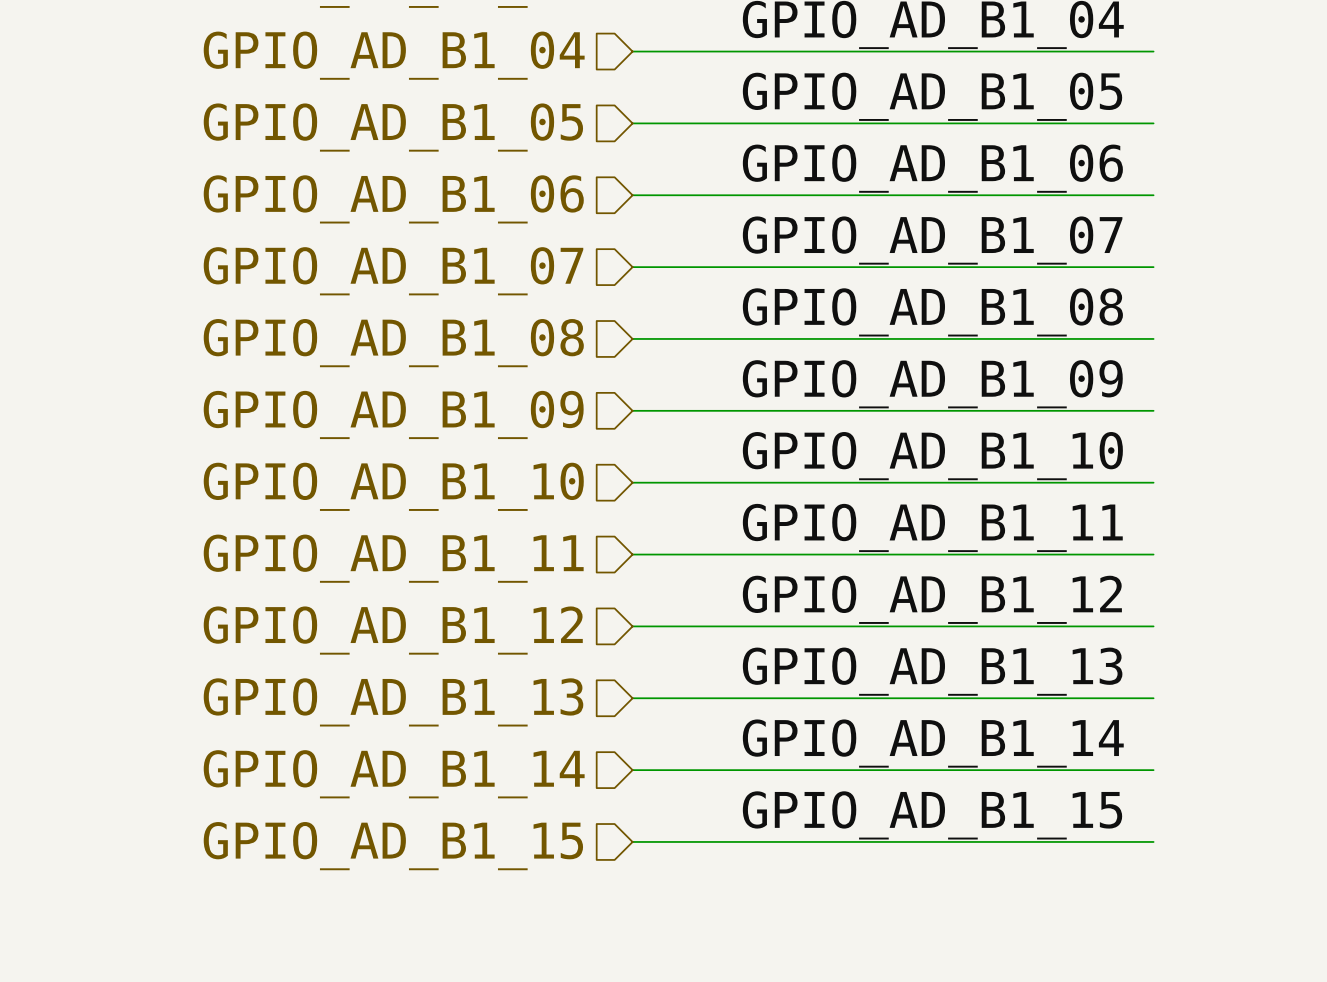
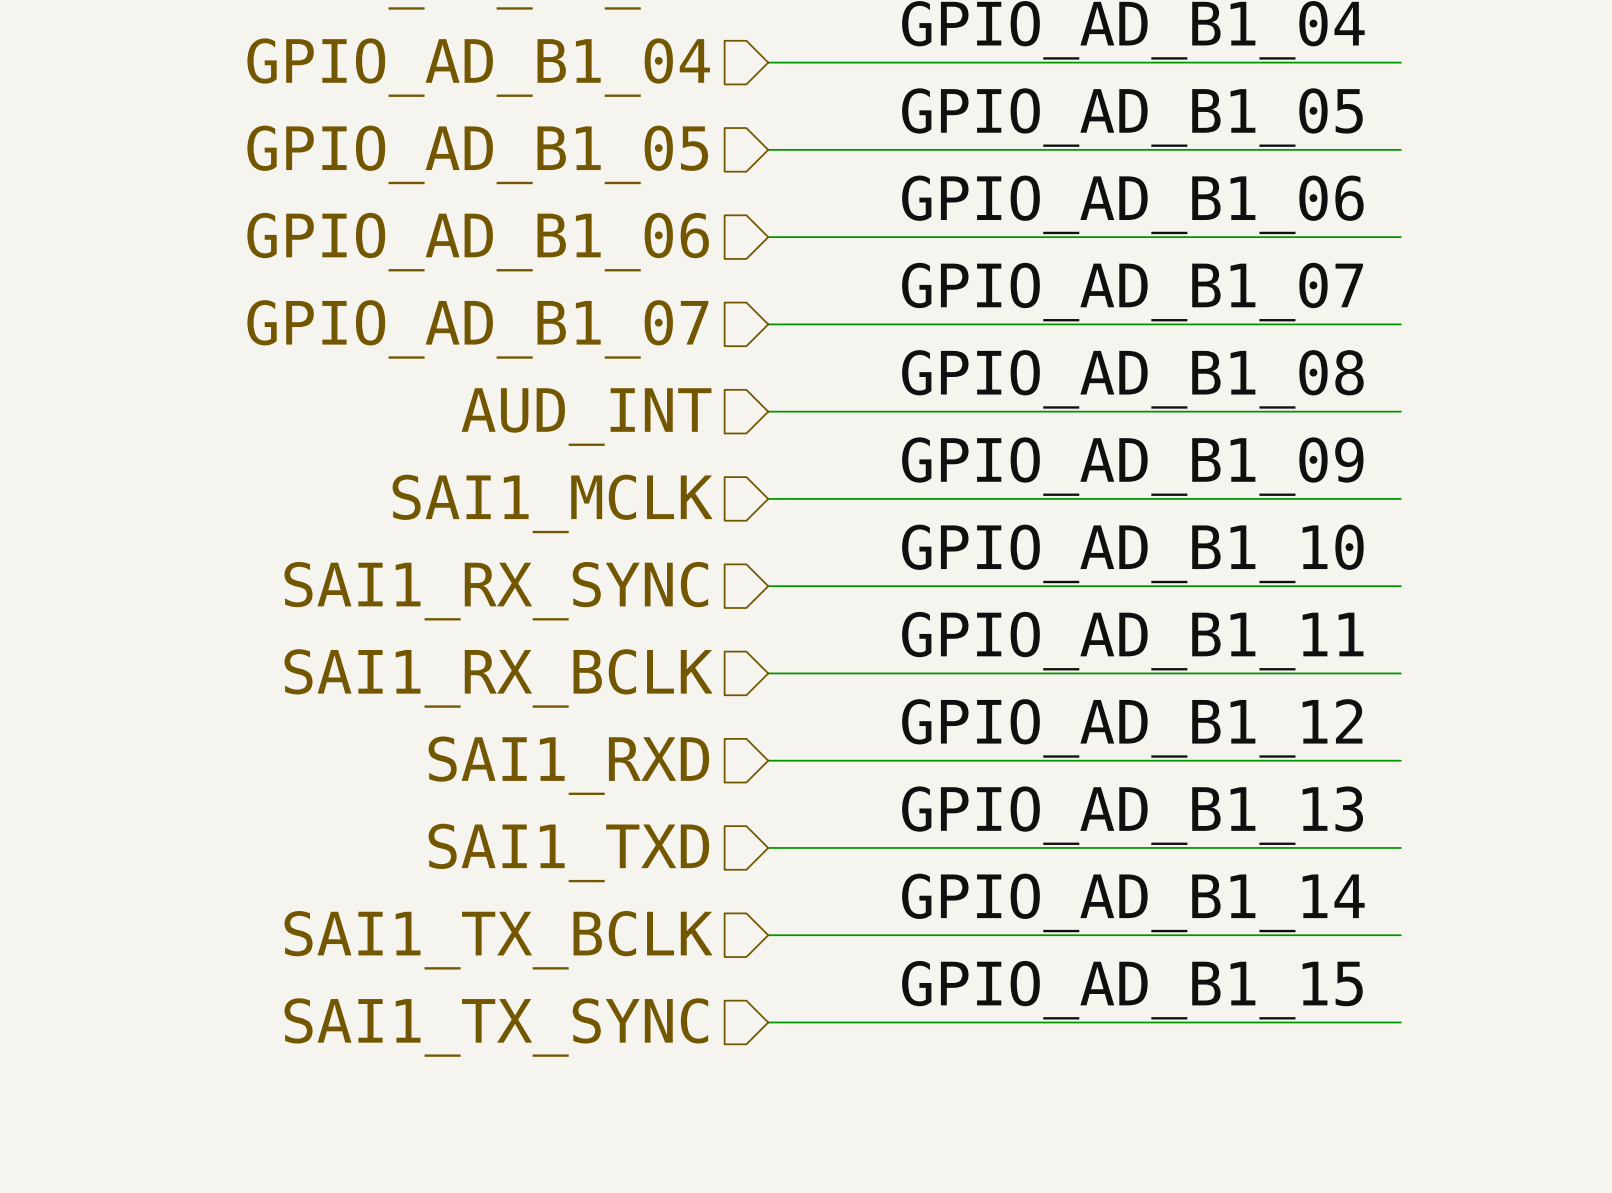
hierarchical label: GPIO_AD_B1_08 (393, 343) -> AUD_INT (586, 417)
hierarchical label: GPIO_AD_B1_09 (393, 414) -> SAI1_MCLK (552, 503)
hierarchical label: GPIO_AD_B1_10 (393, 486) -> SAI1_RX_SYNC (496, 591)
hierarchical label: GPIO_AD_B1_11 (393, 558) -> SAI1_RX_BCLK (498, 678)
hierarchical label: GPIO_AD_B1_12 (393, 630) -> SAI1_RXD (568, 765)
hierarchical label: GPIO_AD_B1_13 (393, 702) -> SAI1_TXD (568, 852)
hierarchical label: GPIO_AD_B1_14 (394, 774) -> SAI1_TX_BCLK (498, 940)
hierarchical label: GPIO_AD_B1_15 (393, 846) -> SAI1_TX_SYNC (496, 1027)

